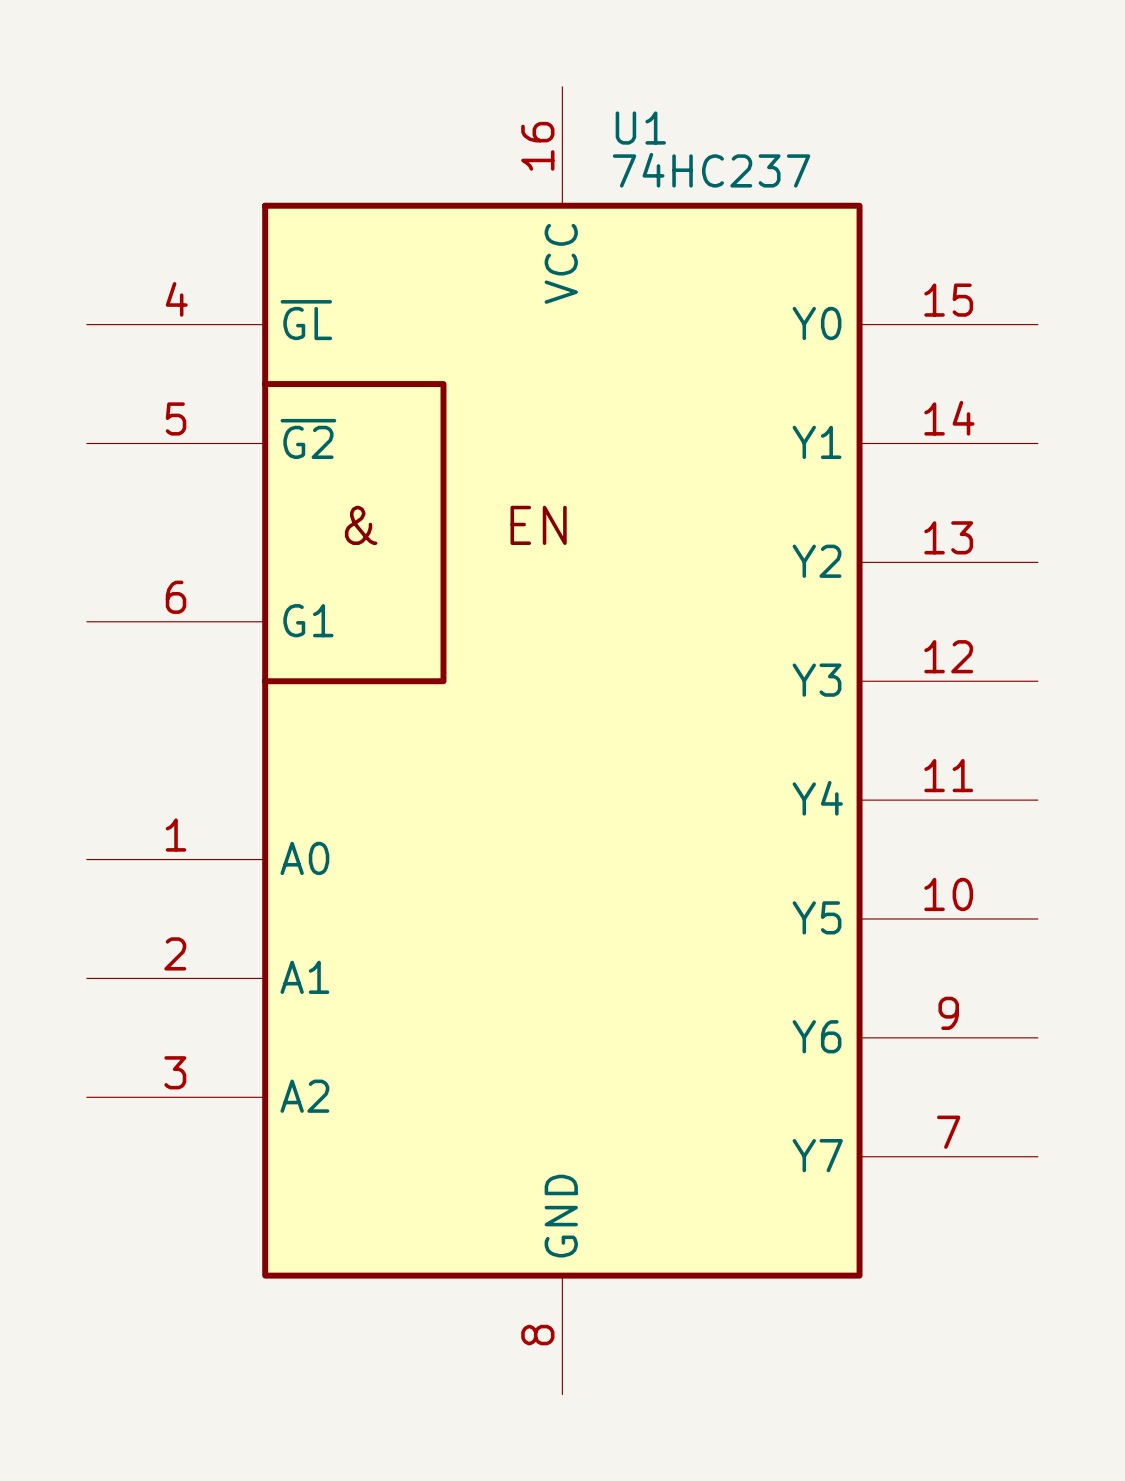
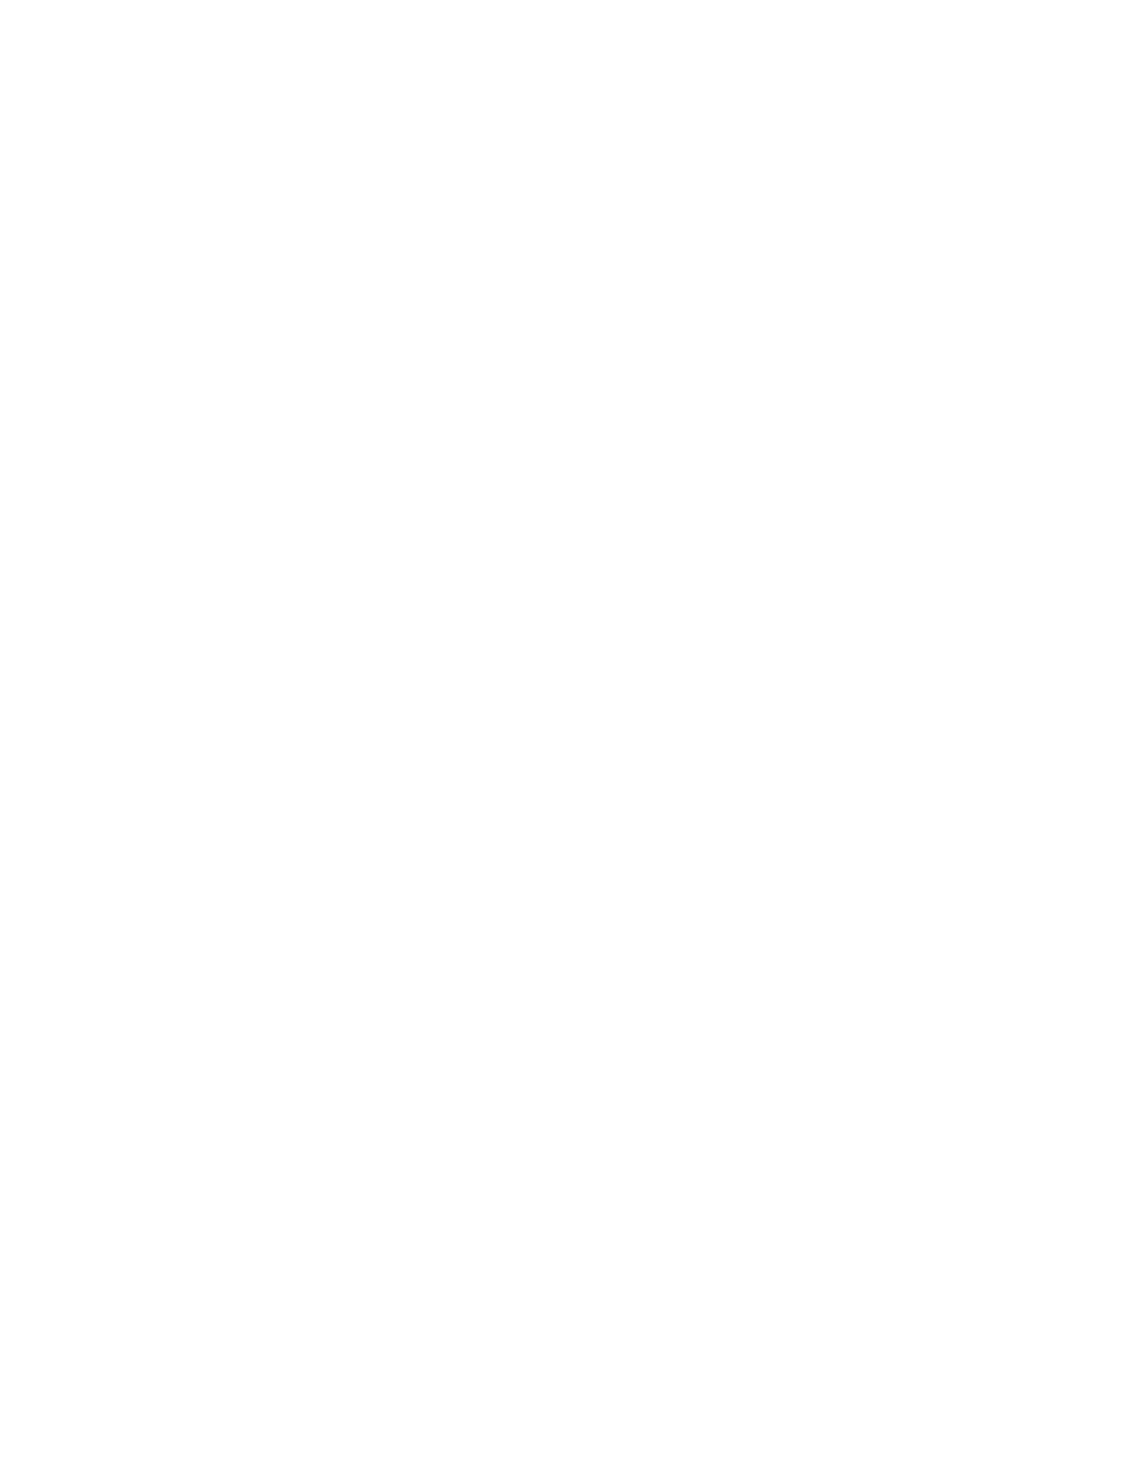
U1: 74HC237 (562, 740) -> none

